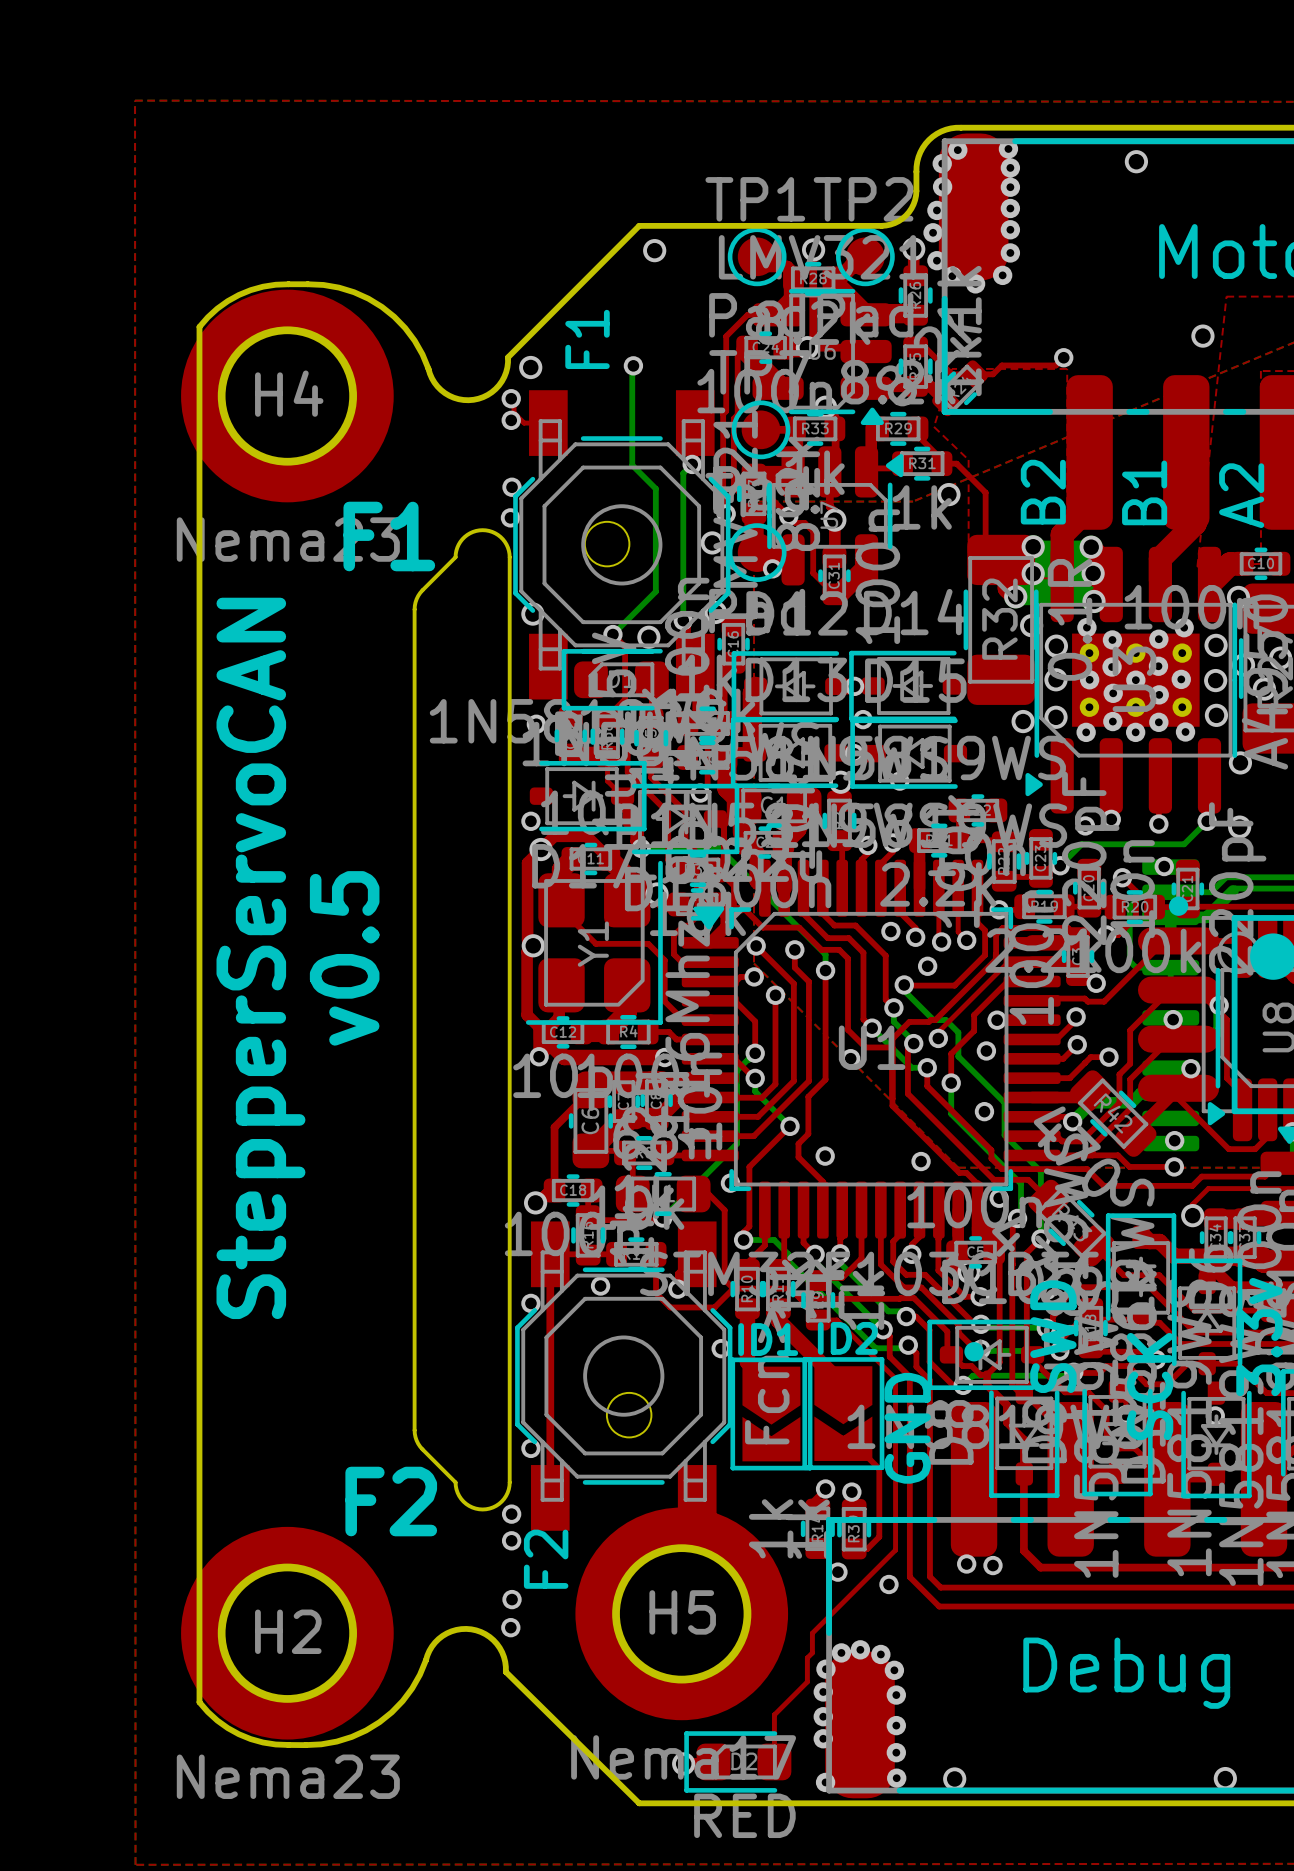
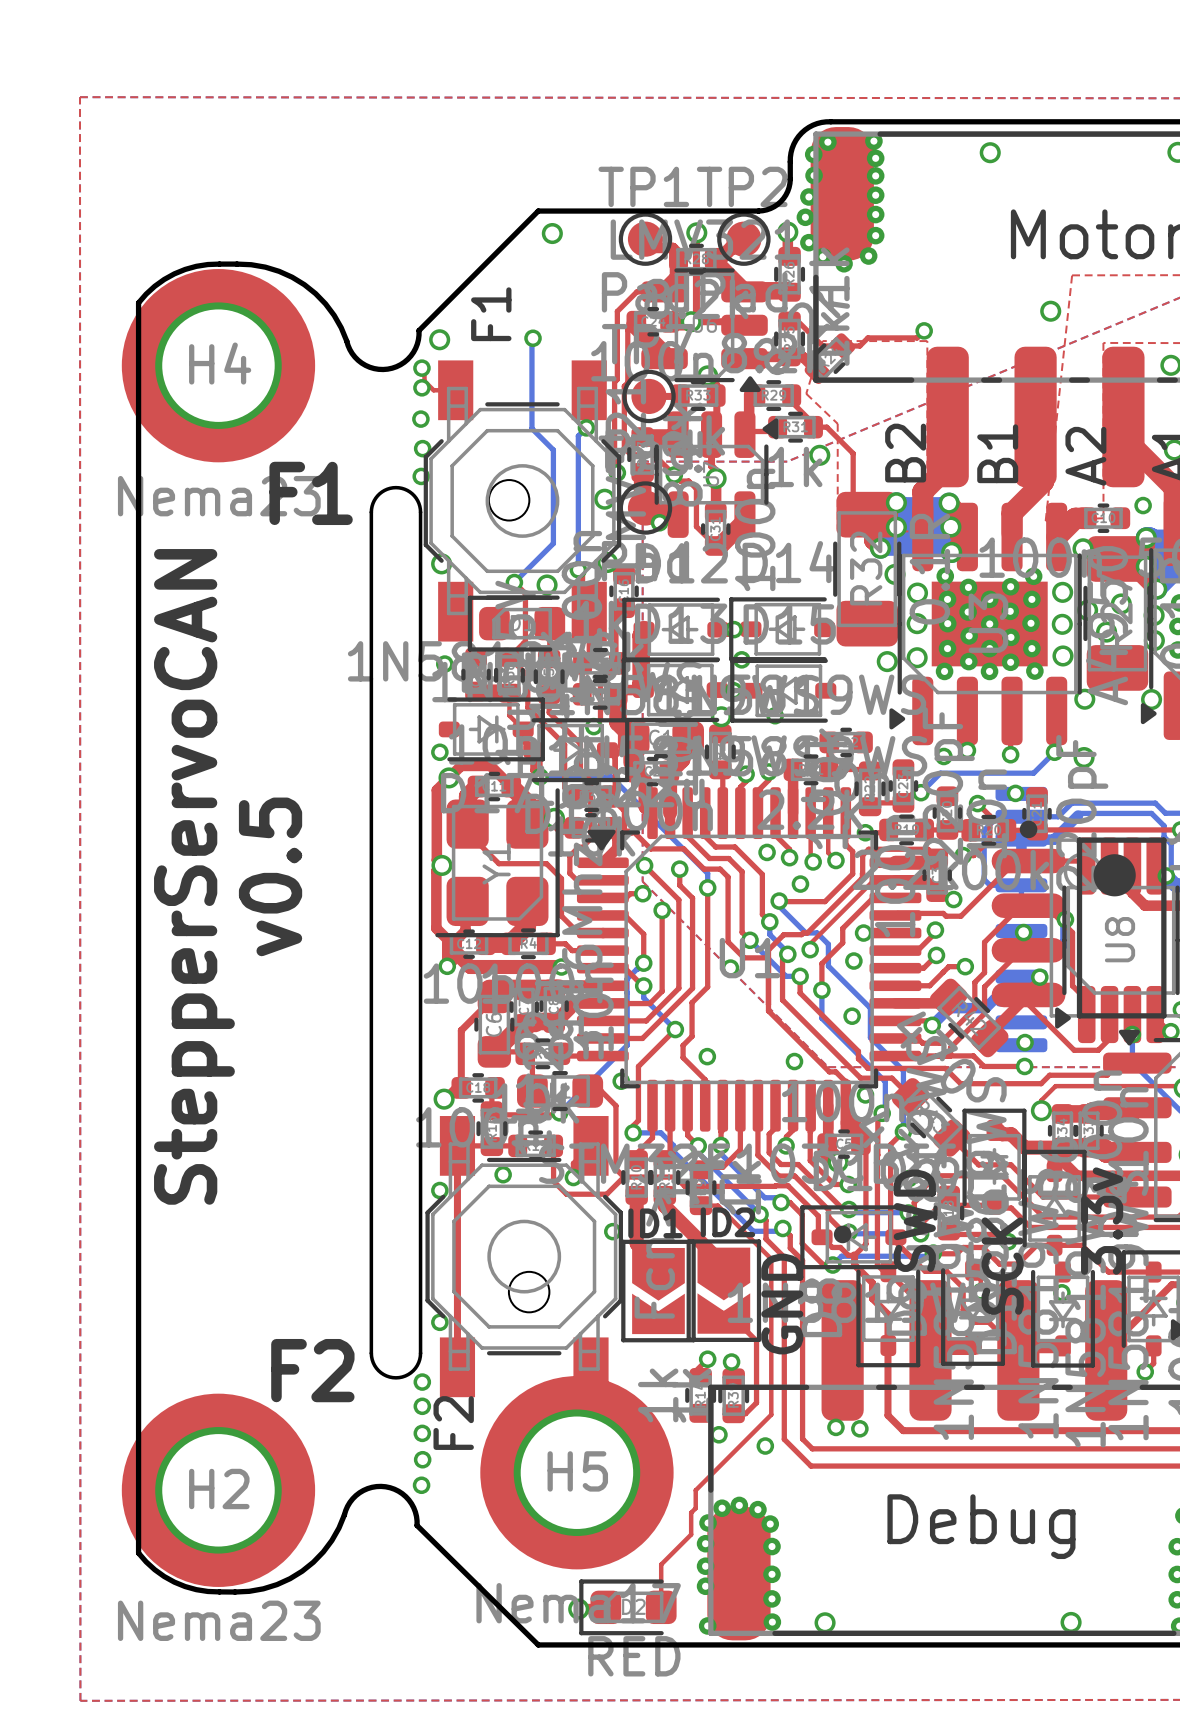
via: none -> (420, 419)
board edge: (455, 557) (420, 592) (414, 609) (414, 1430) (420, 1446) (455, 1482) -> (371, 512) (371, 1353)
via: none -> (422, 1433)

